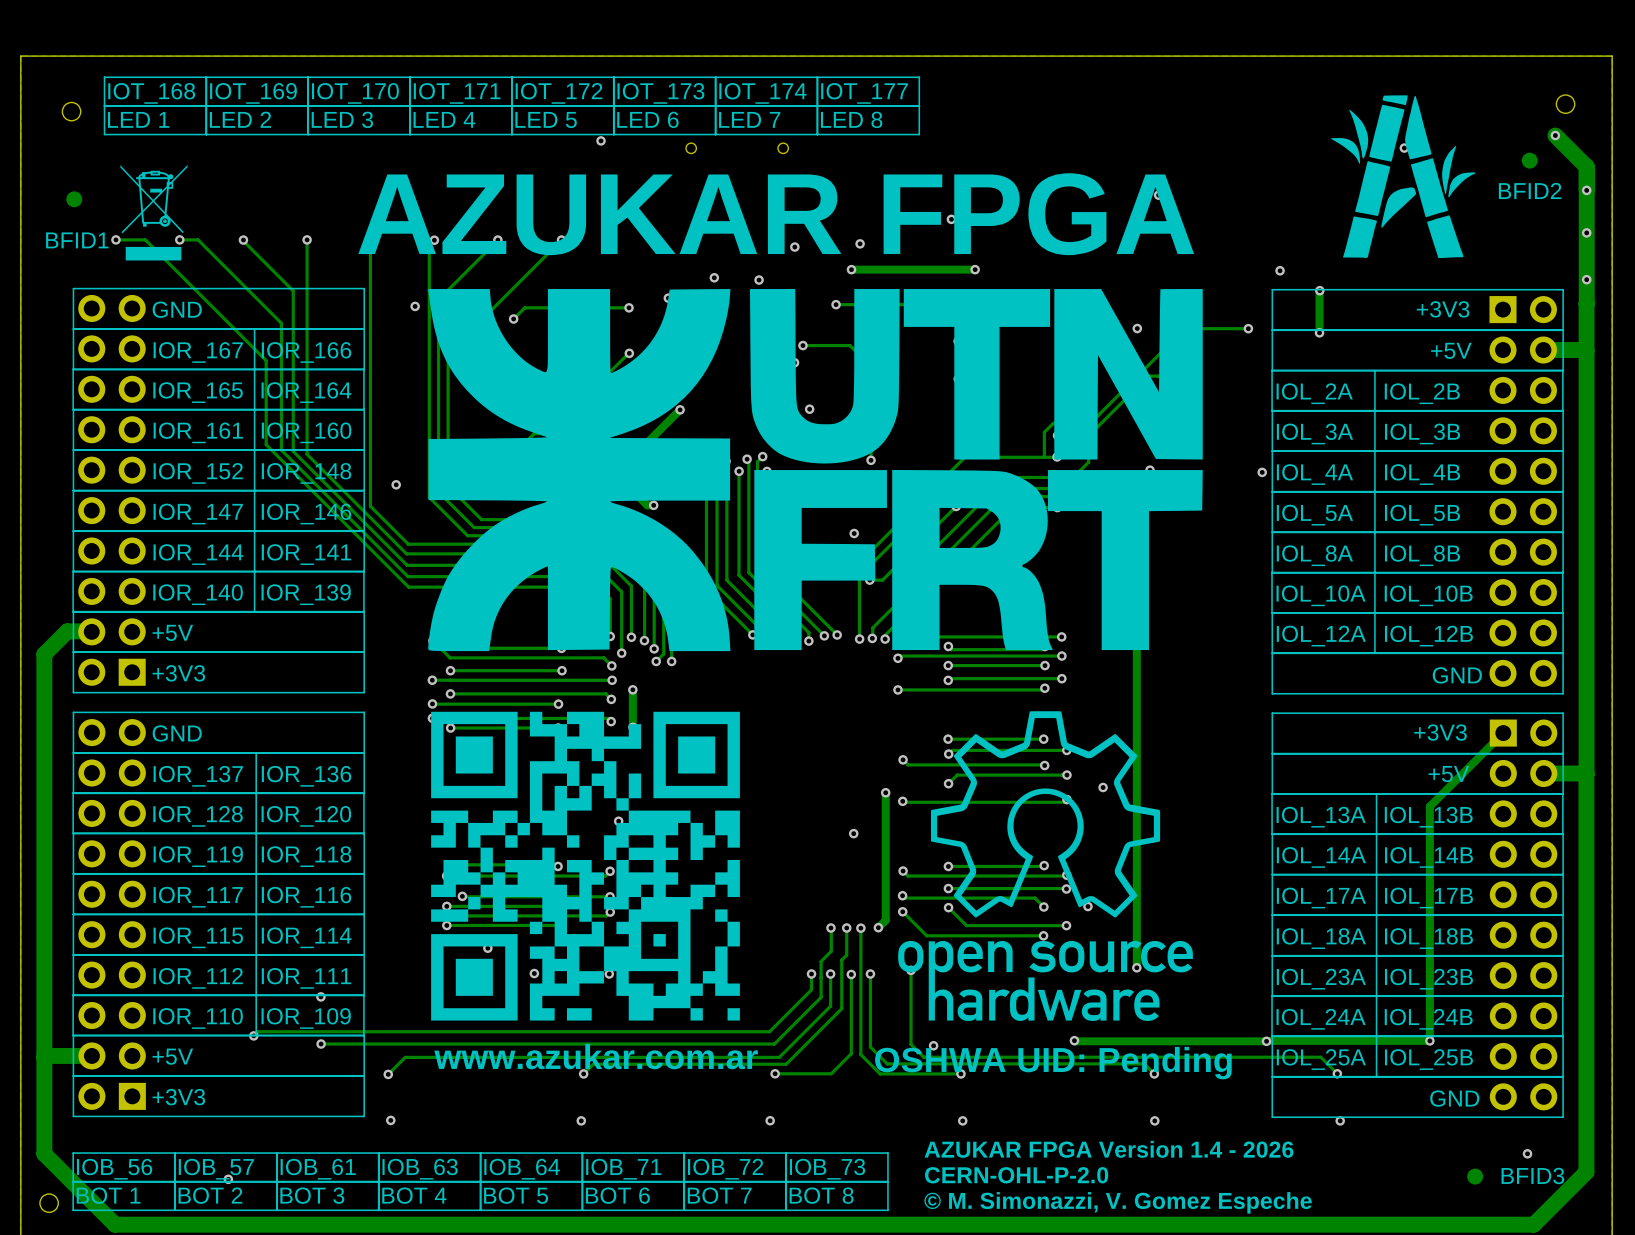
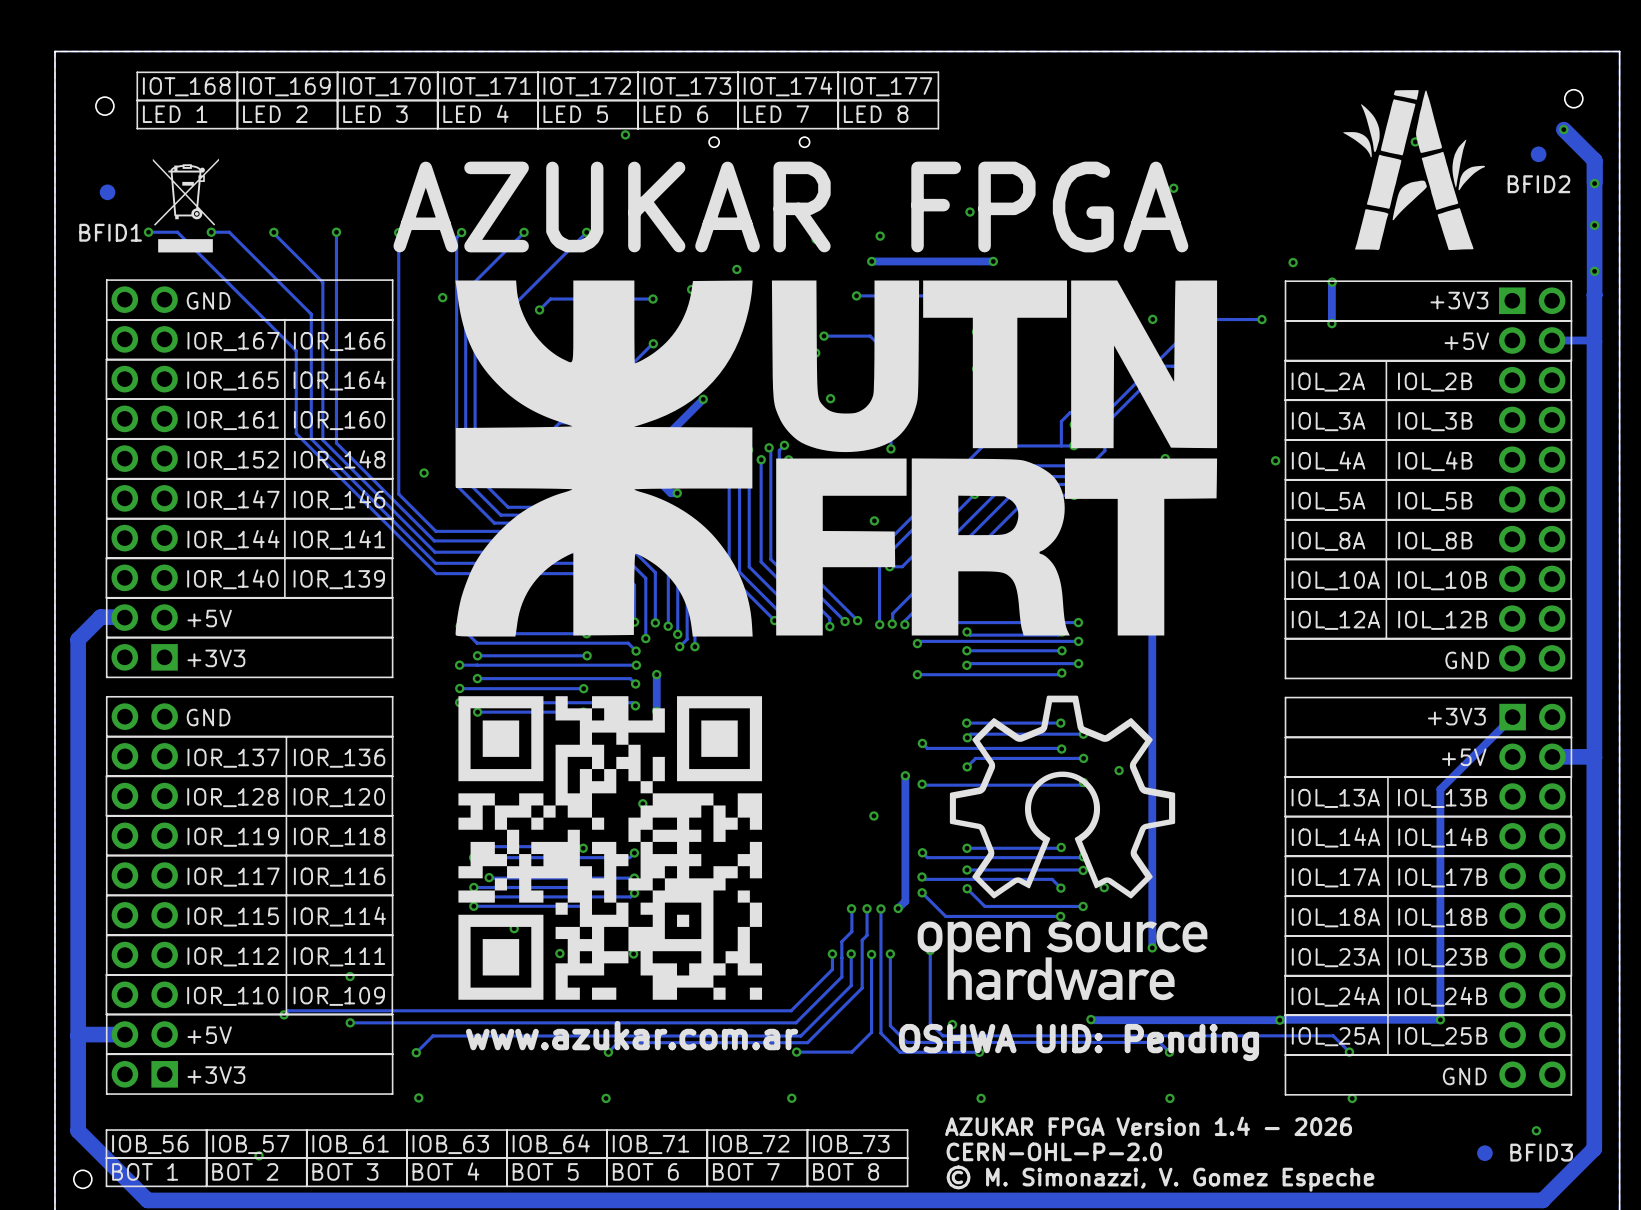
via: (759, 280) -> none
track width: thick (1585, 350) (1543, 350) -> thin (1593, 340) (1552, 340)

